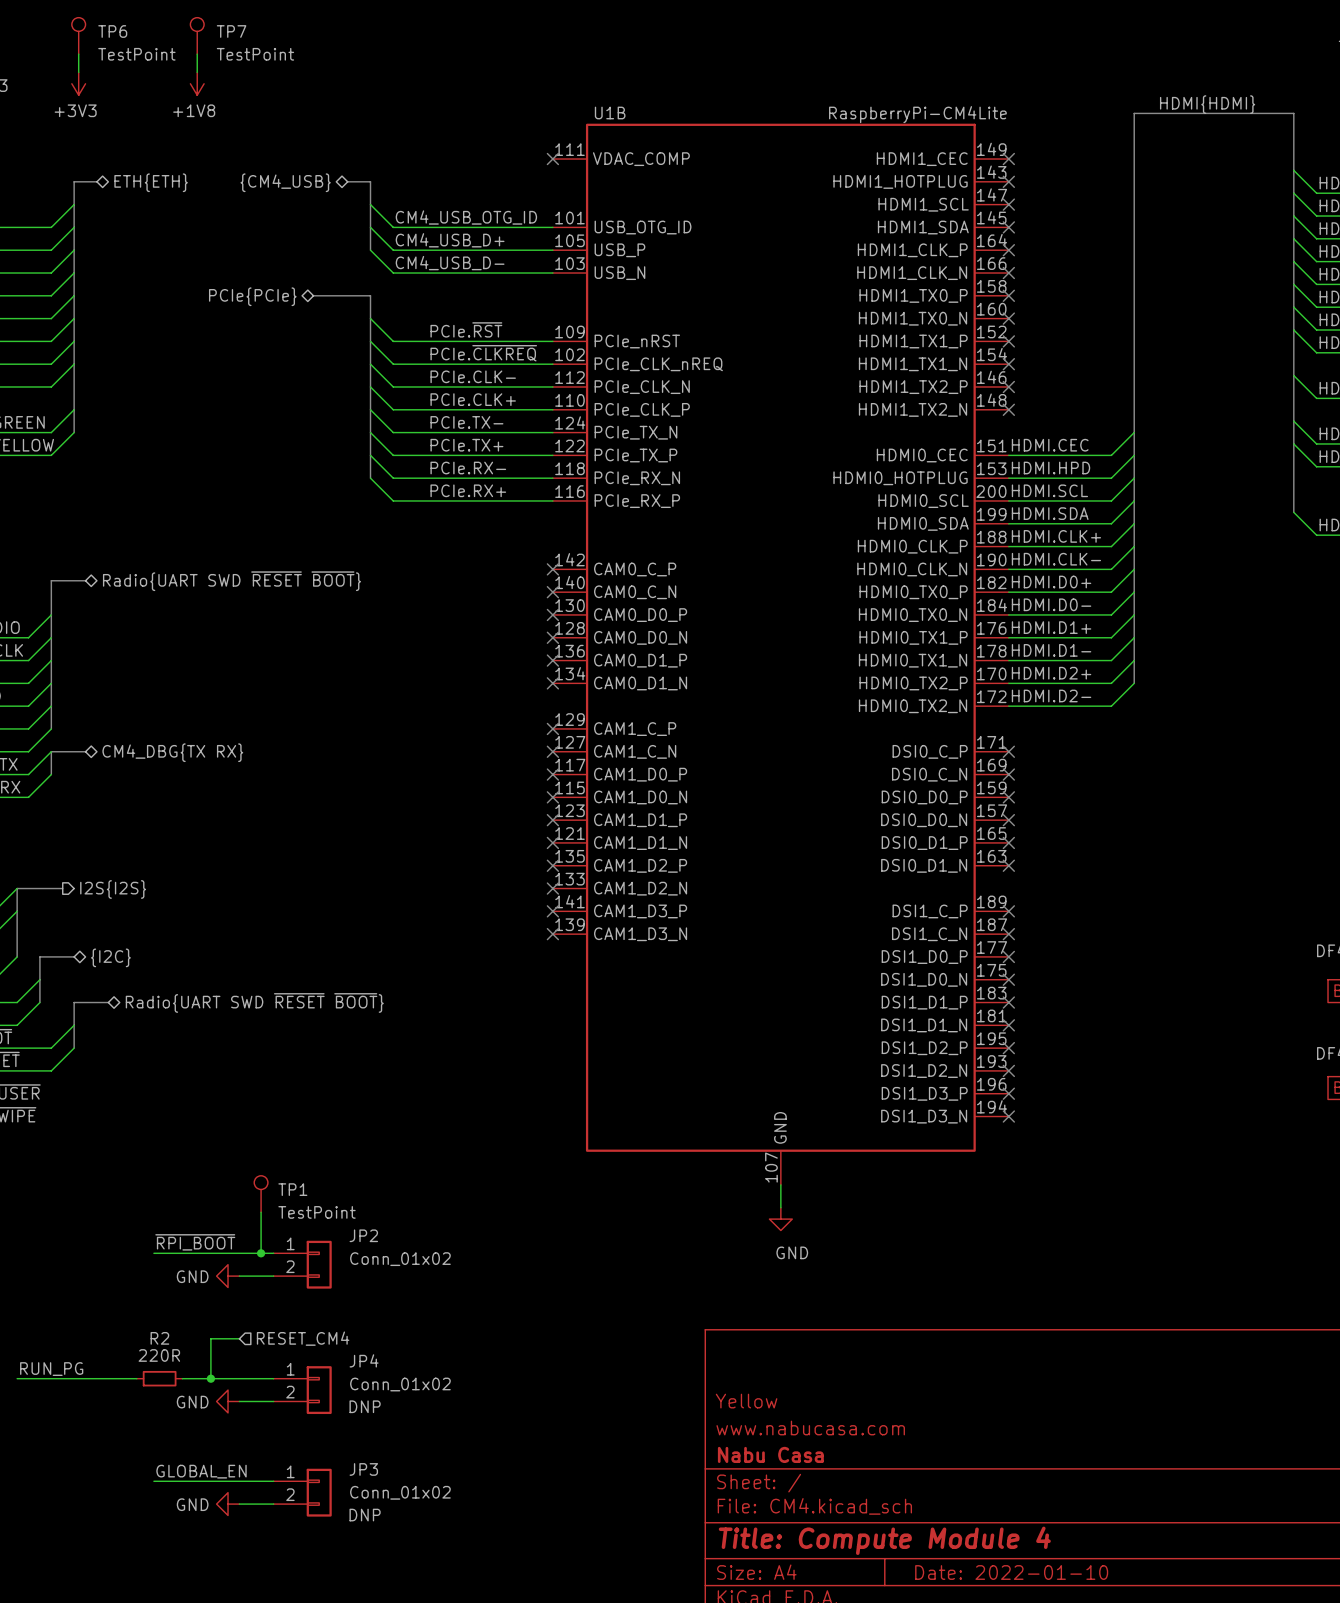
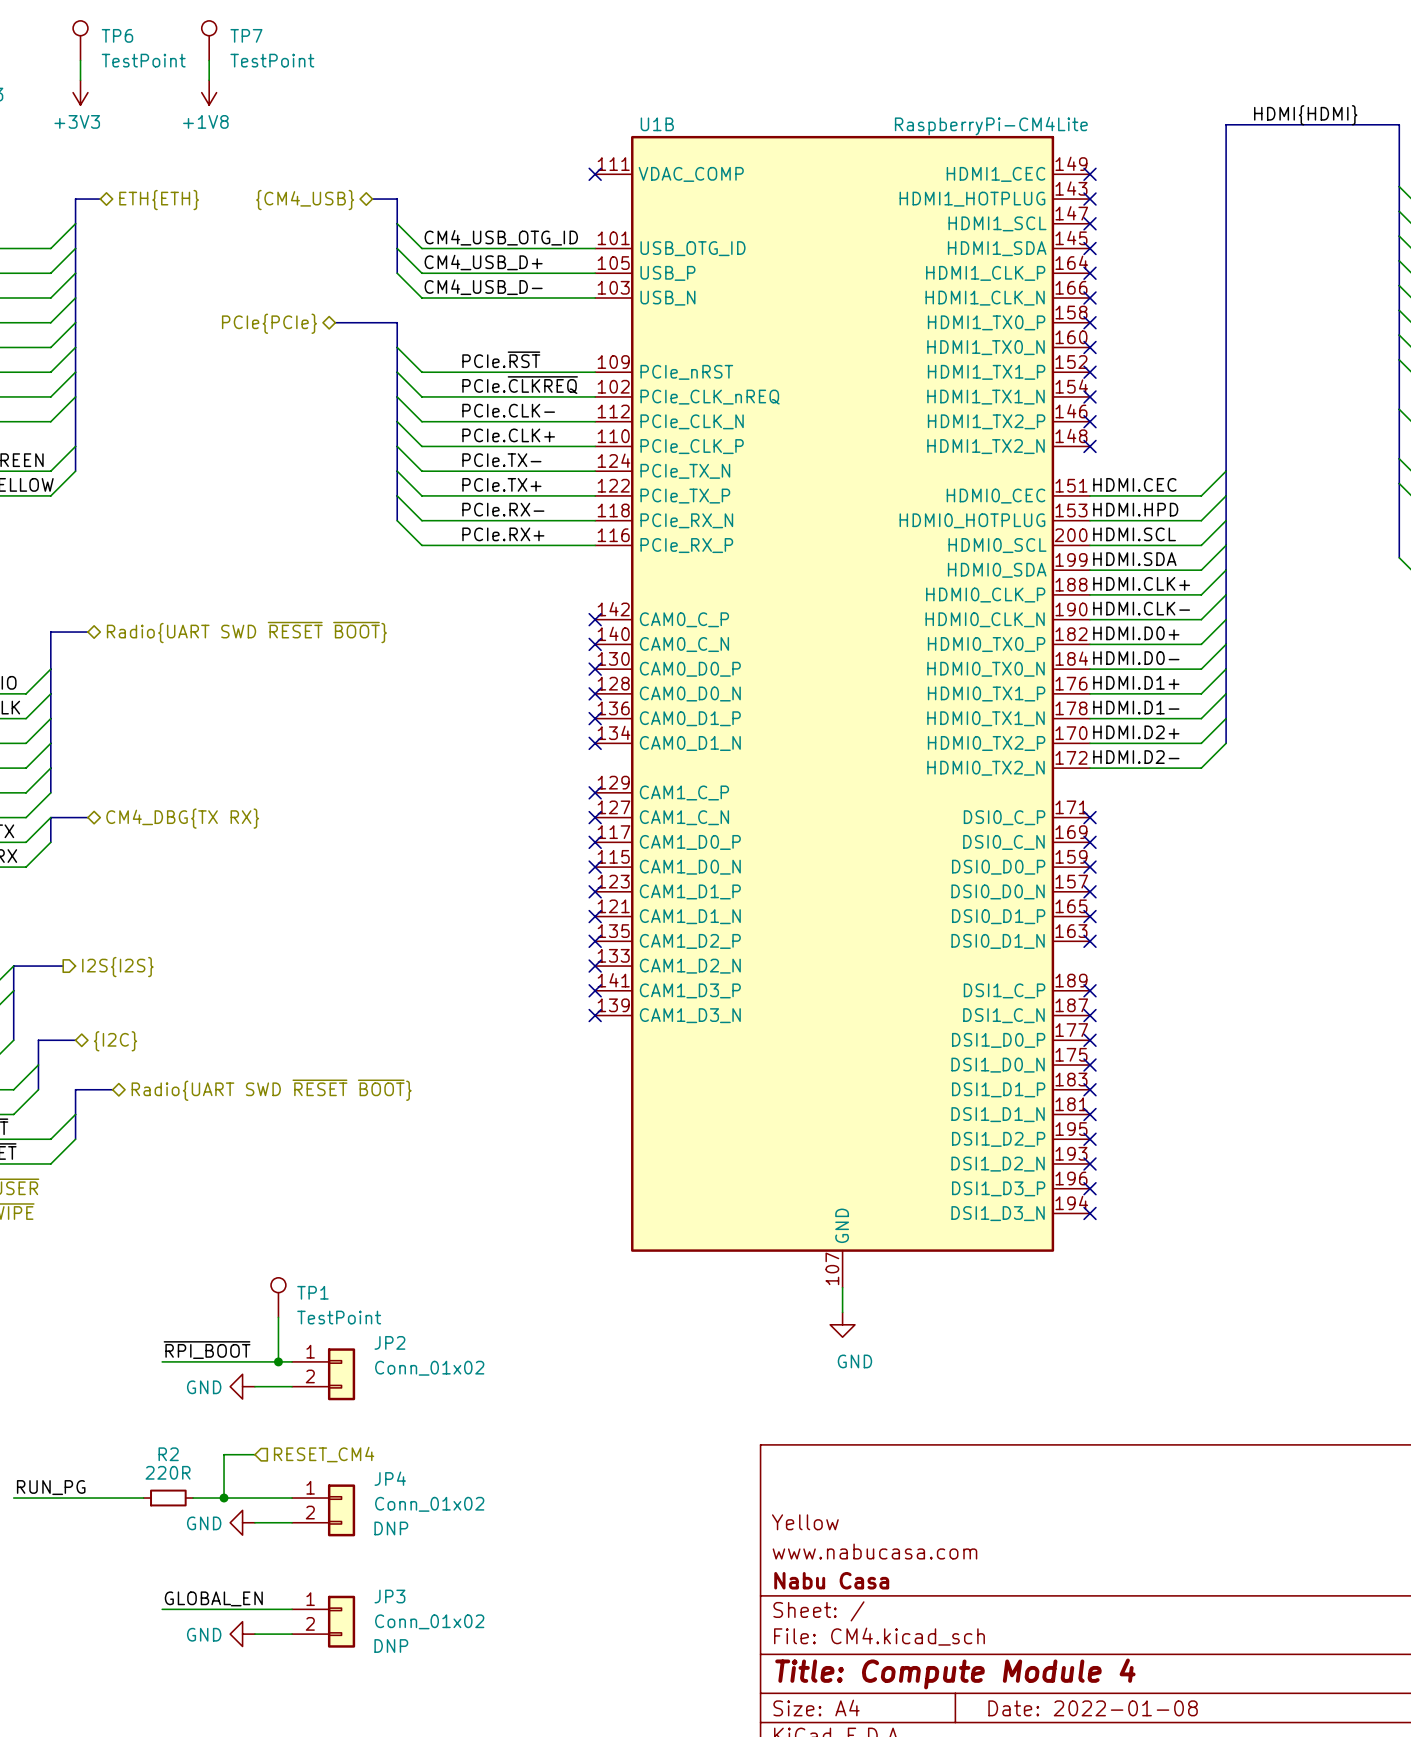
title block: Date: 2022-01-10 (1011, 1572) -> Date: 2022-01-08 (1093, 1708)

